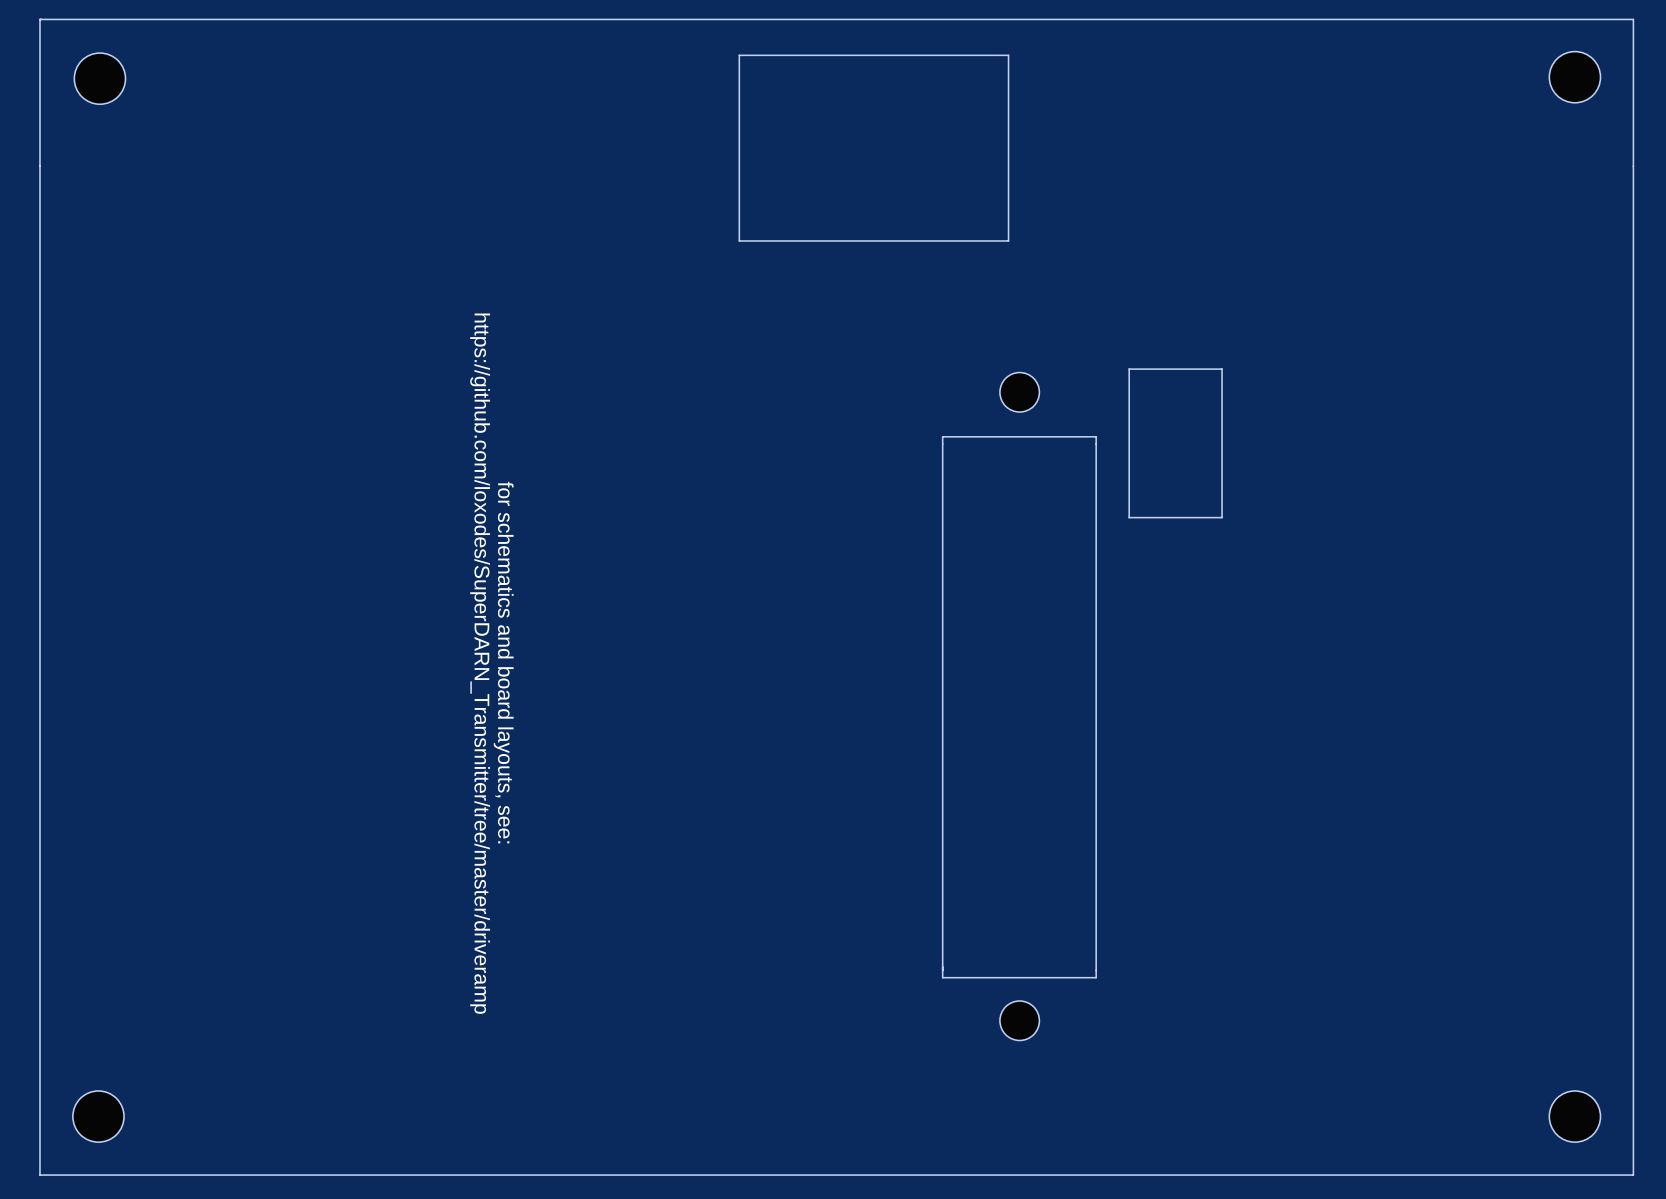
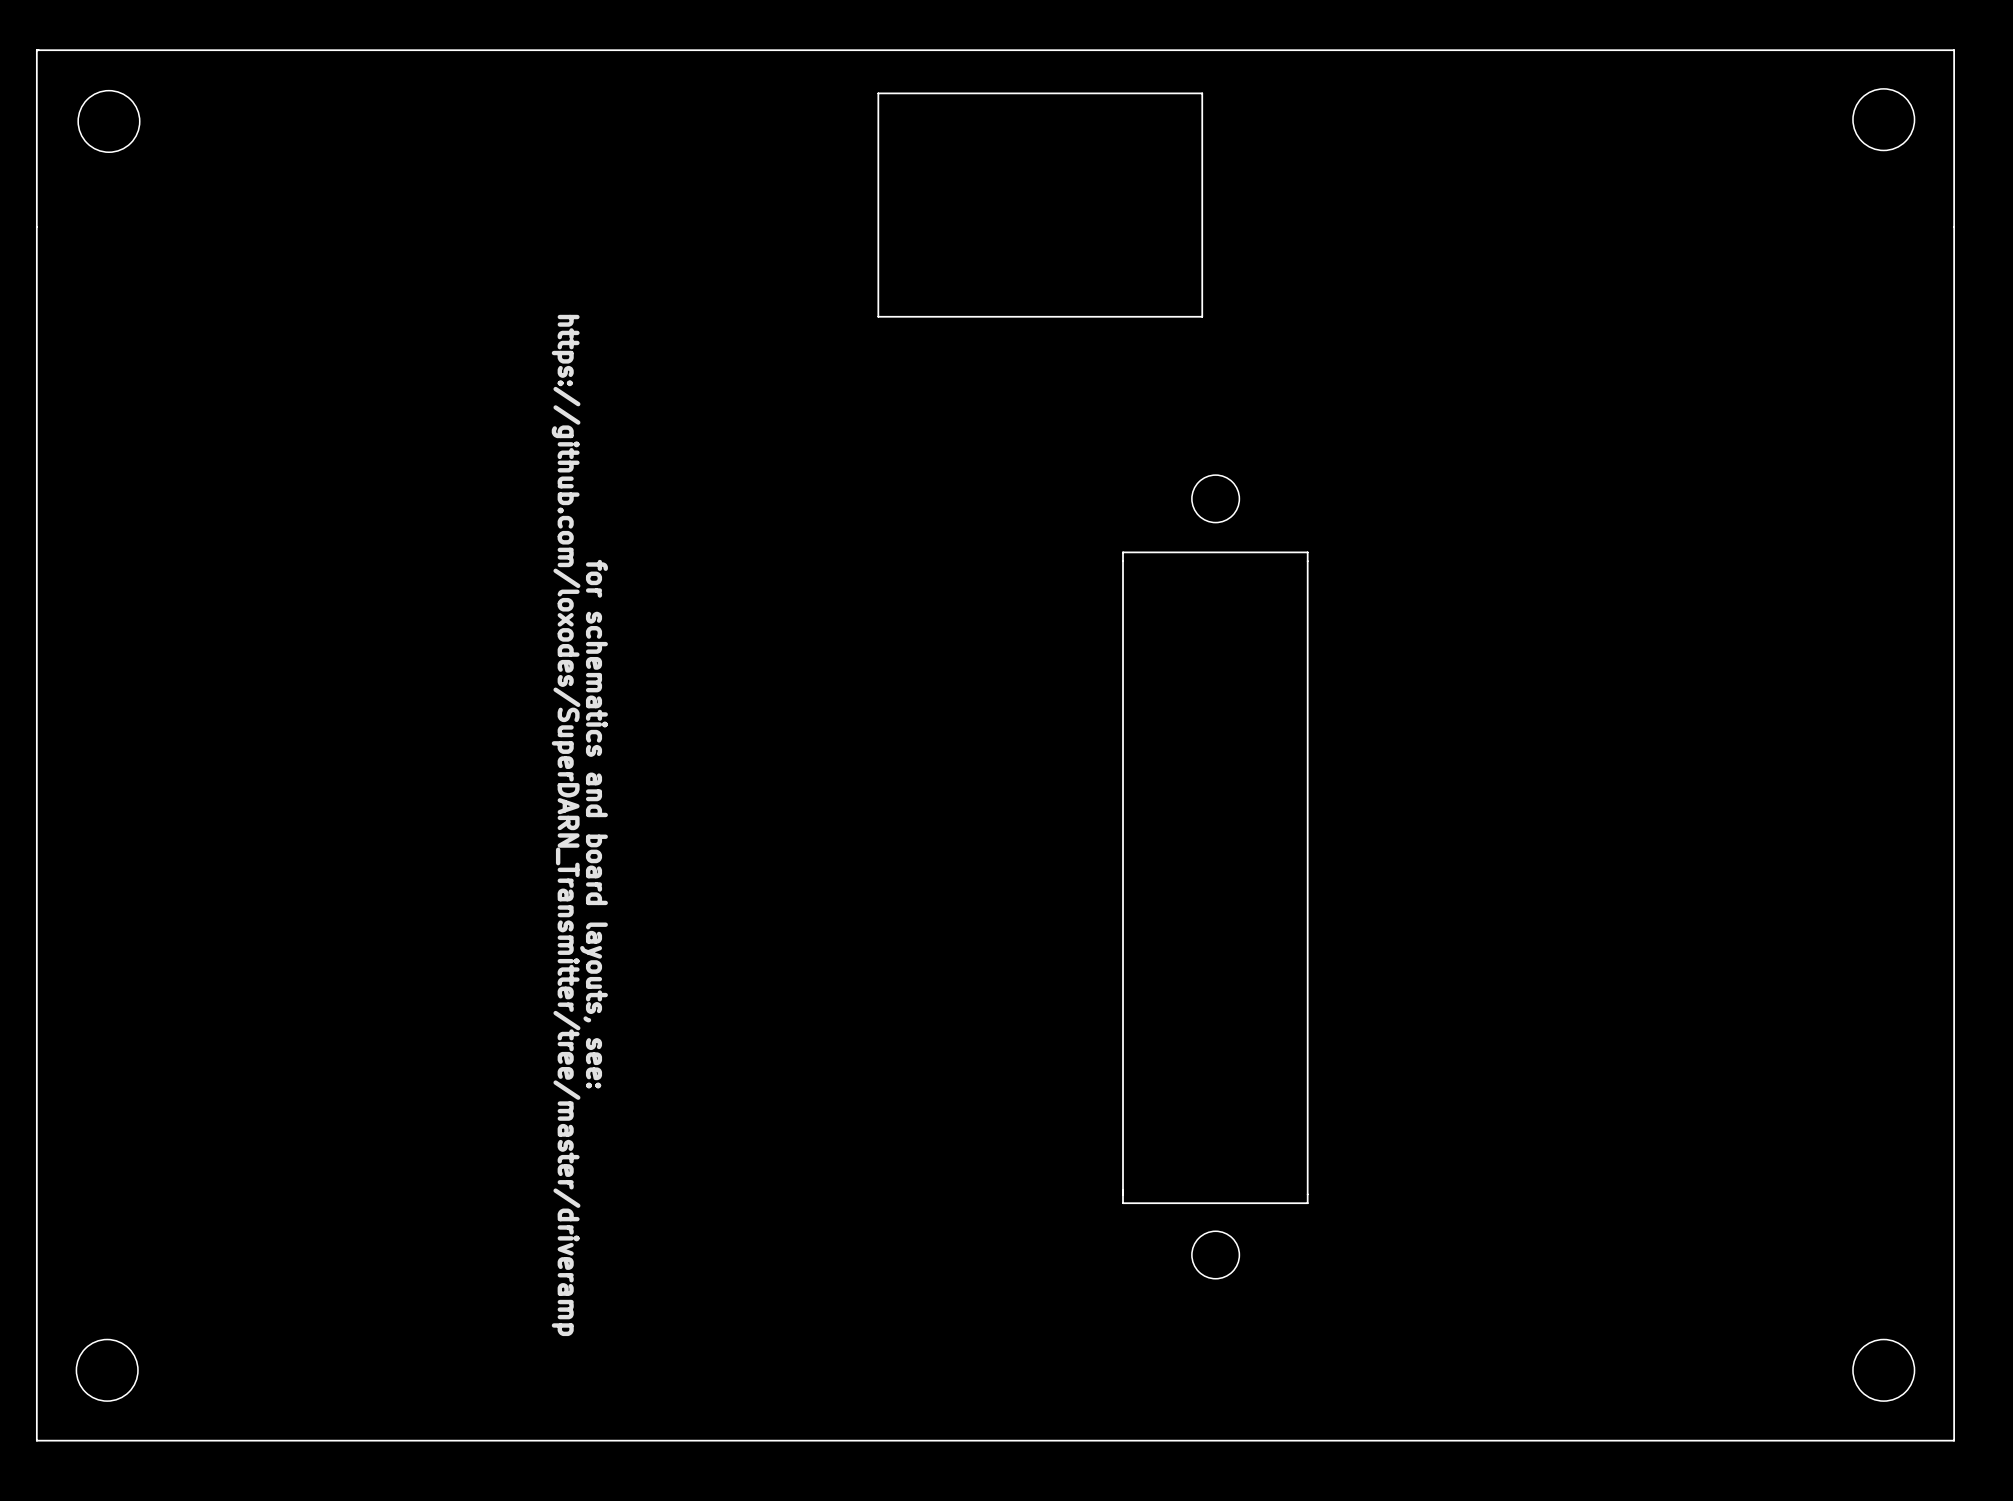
board edge: (1222, 369) (1129, 369) (1129, 517) (1222, 517) (1222, 369) -> none

